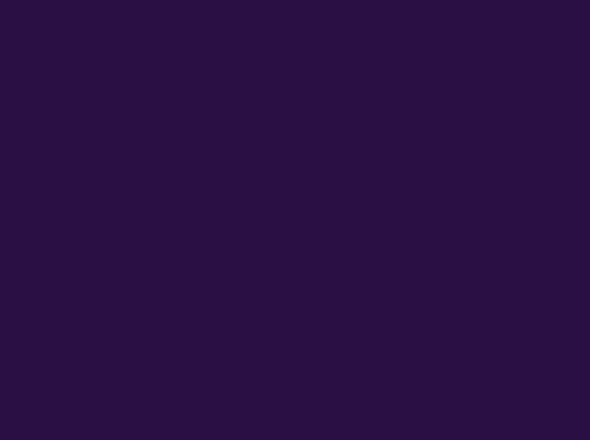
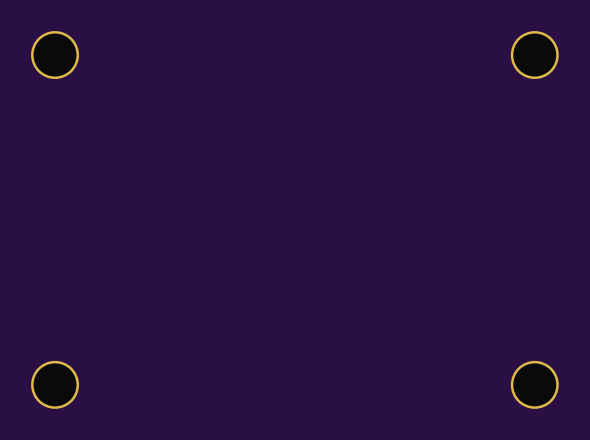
part: none -> (55, 55)
part: none -> (534, 55)
part: none -> (55, 384)
part: none -> (534, 384)

